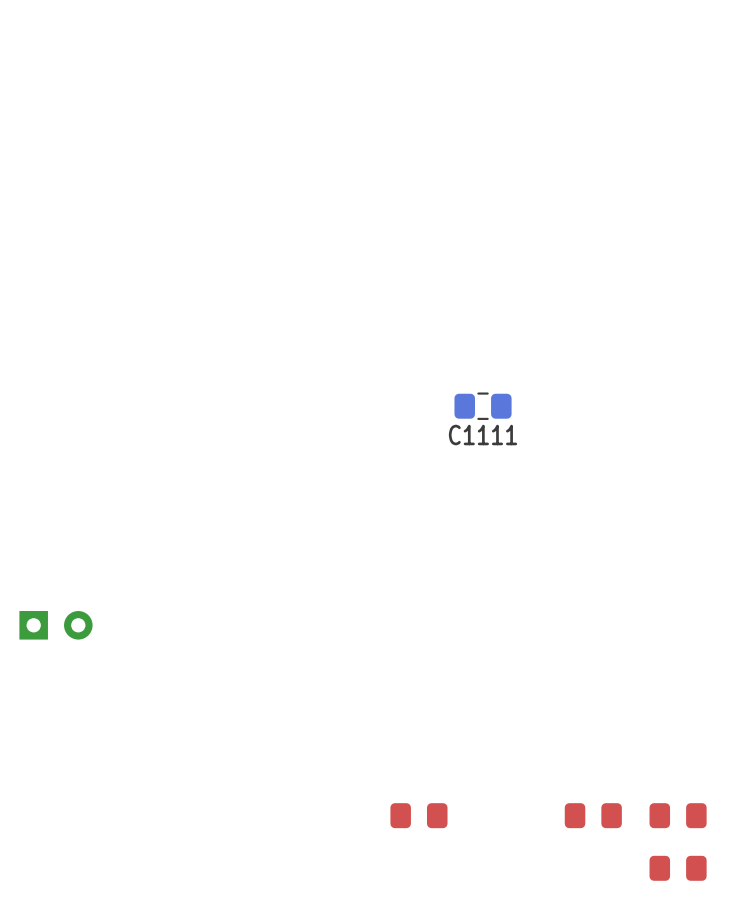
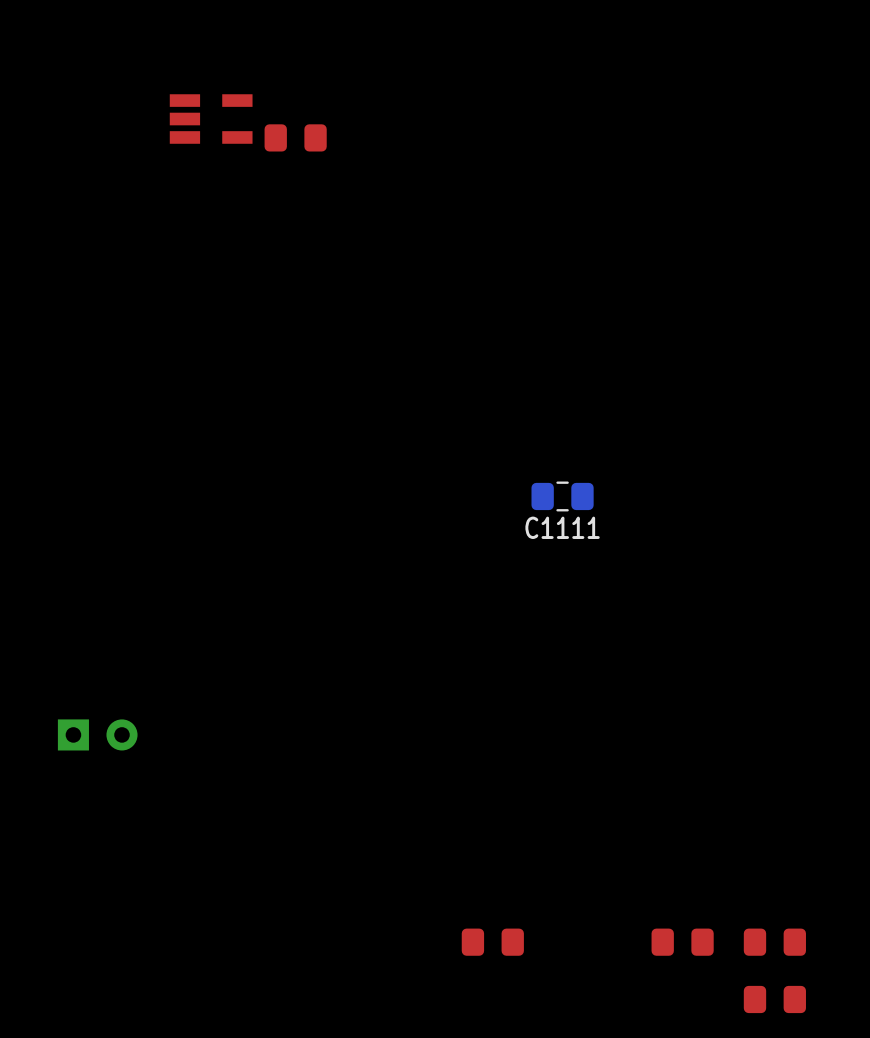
part: none -> (211, 119)
part: none -> (295, 137)

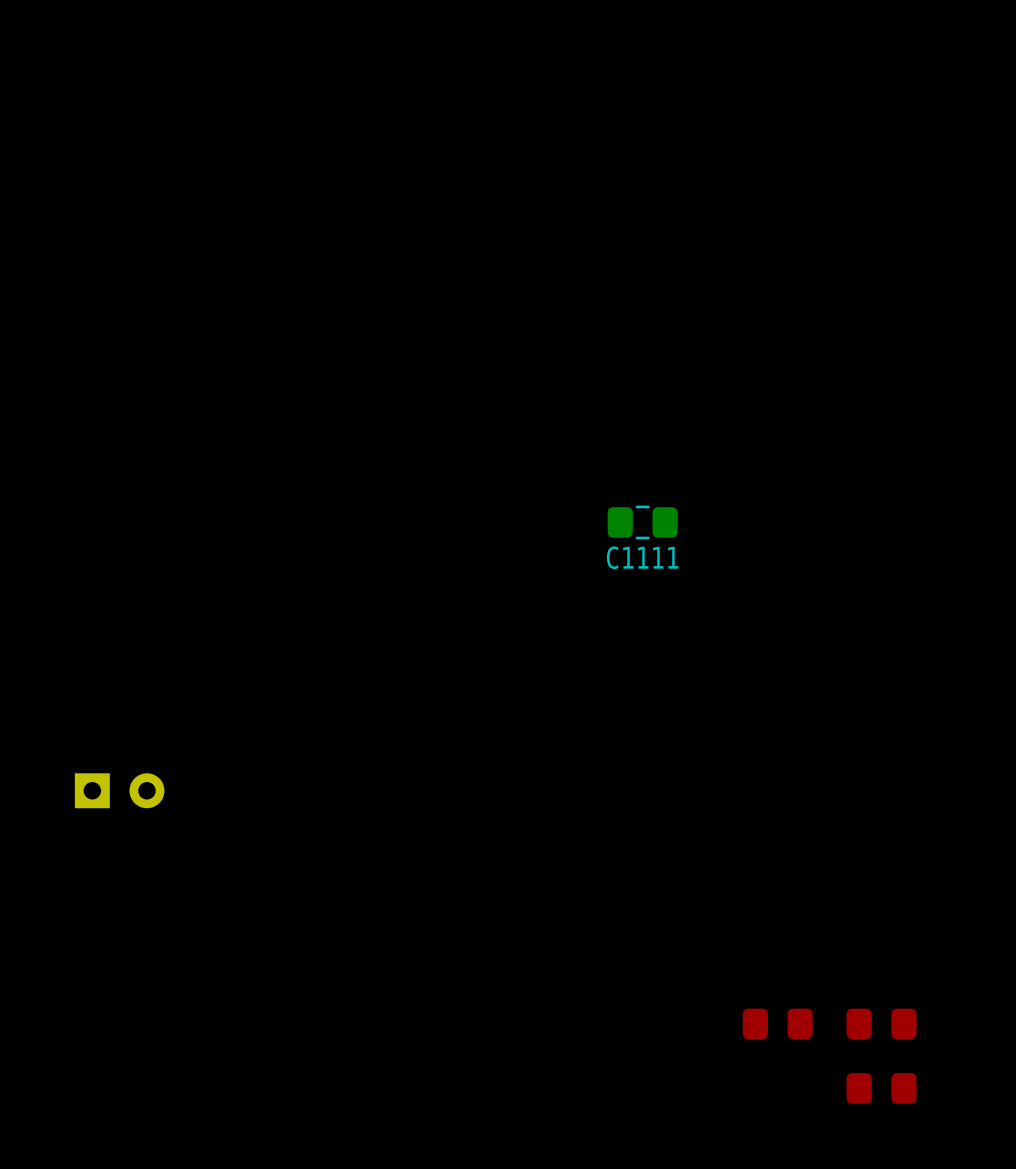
part: (211, 119) -> none
part: (295, 137) -> none
part: (492, 942) -> none

